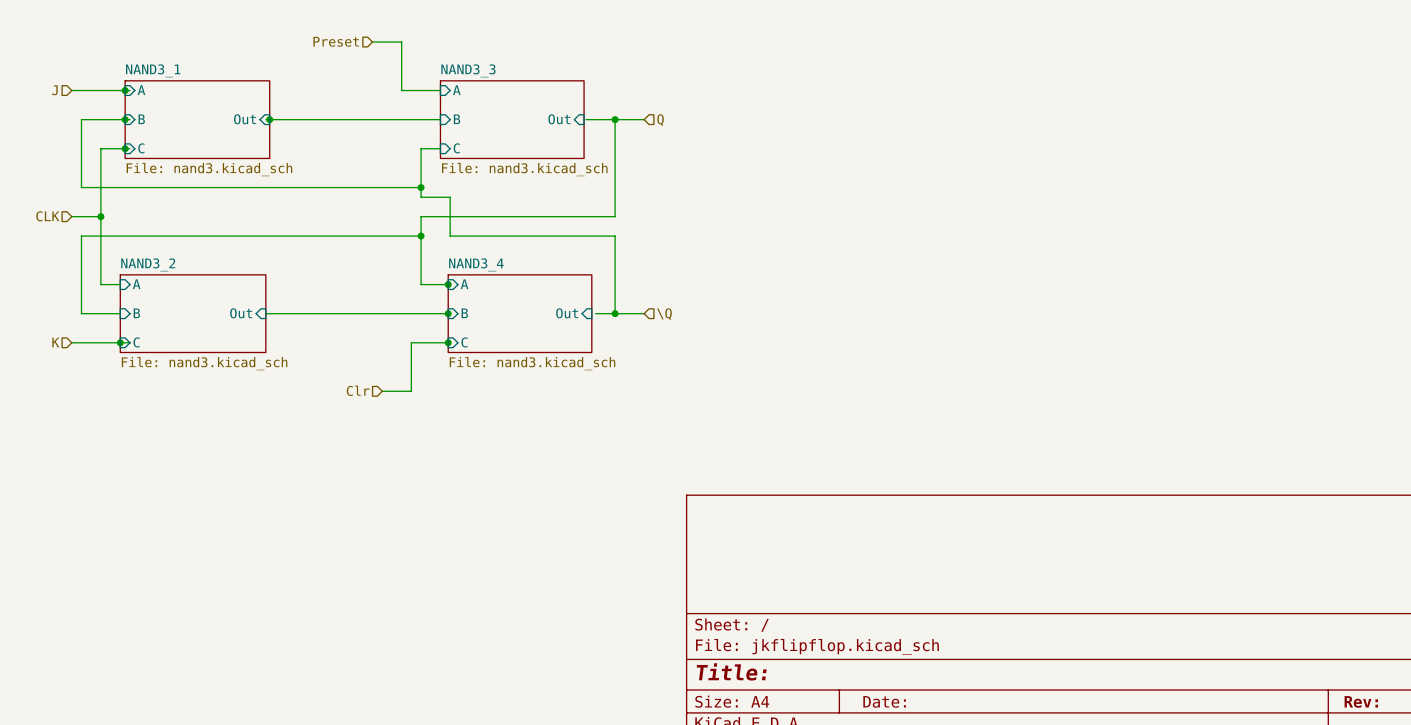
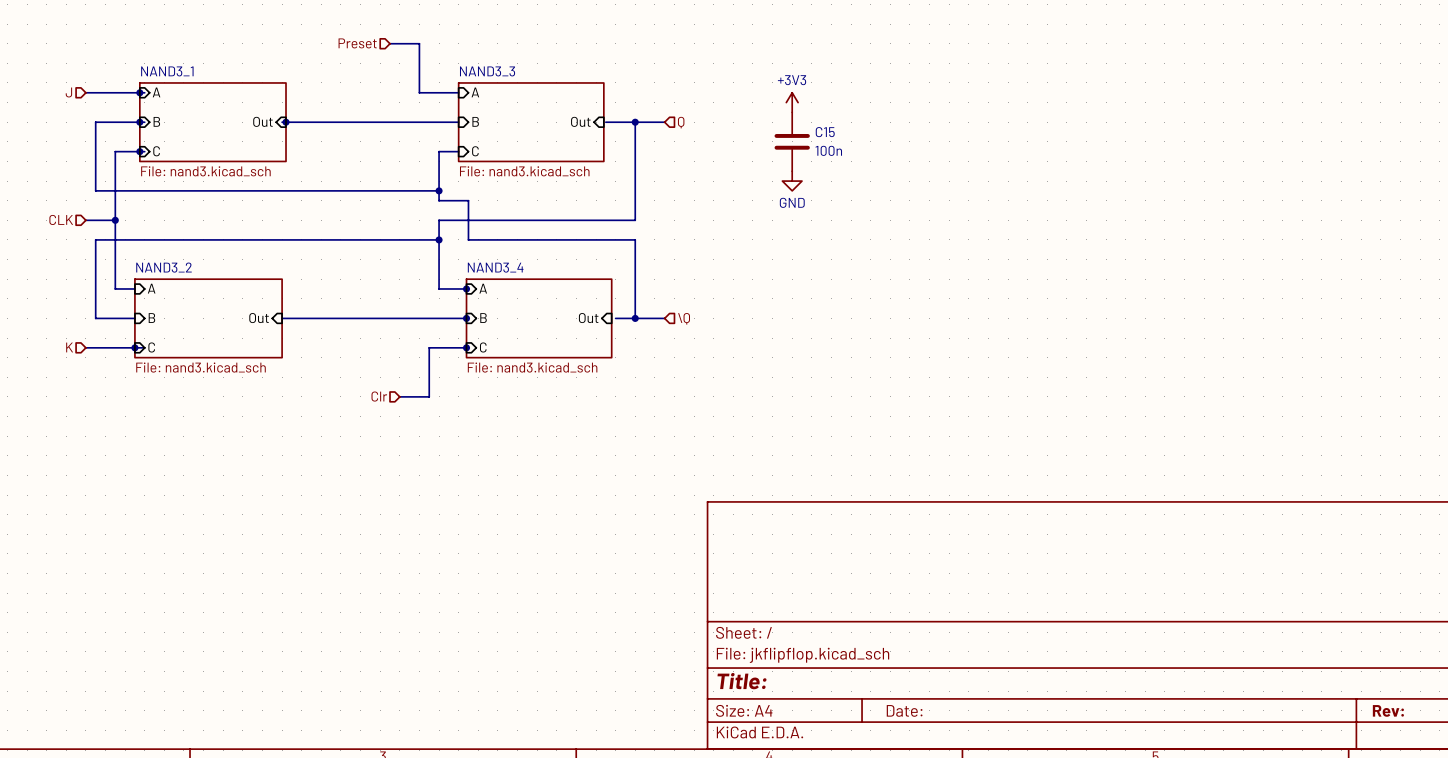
power symbol: none -> +3V3 (792, 102)
C15: none -> 100n (792, 141)
power symbol: none -> GND (792, 181)

